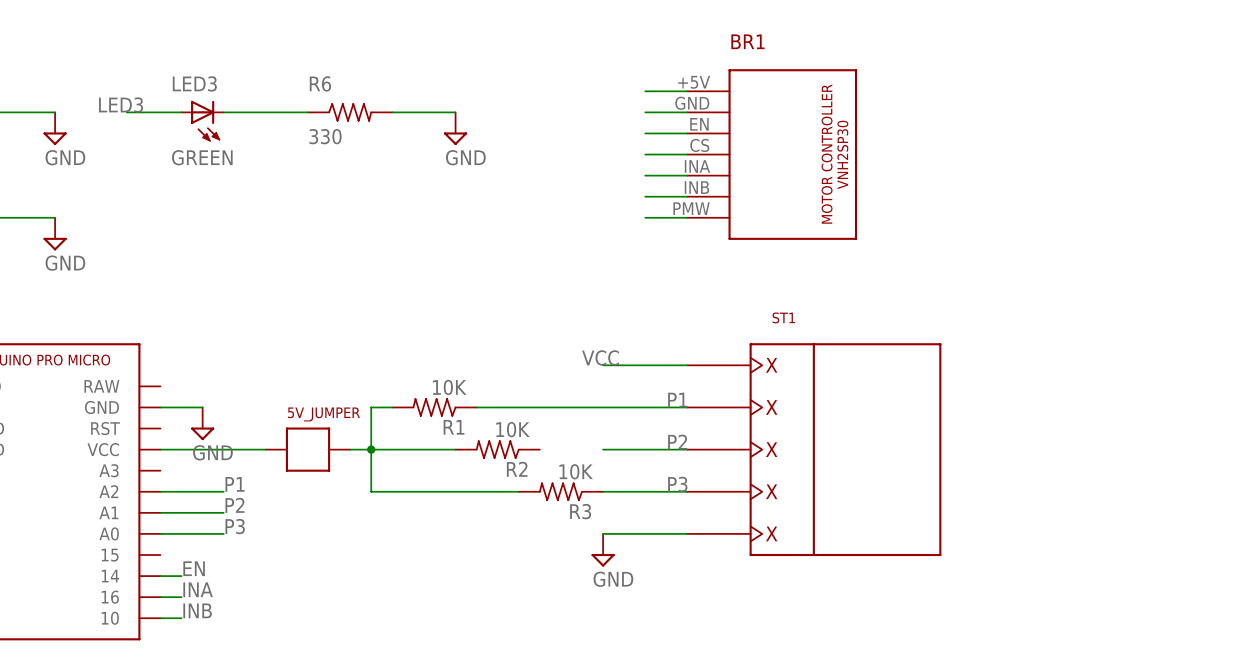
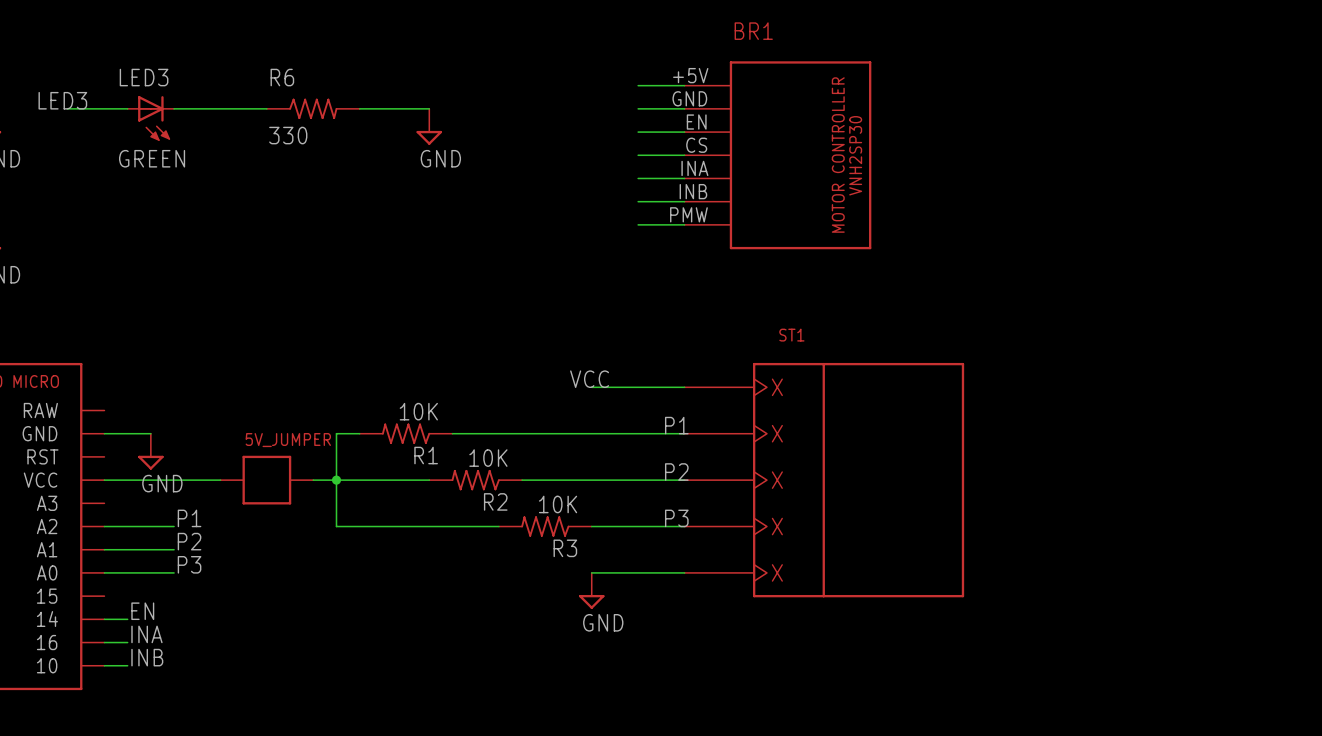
wire: none -> (522, 480) (591, 480)

